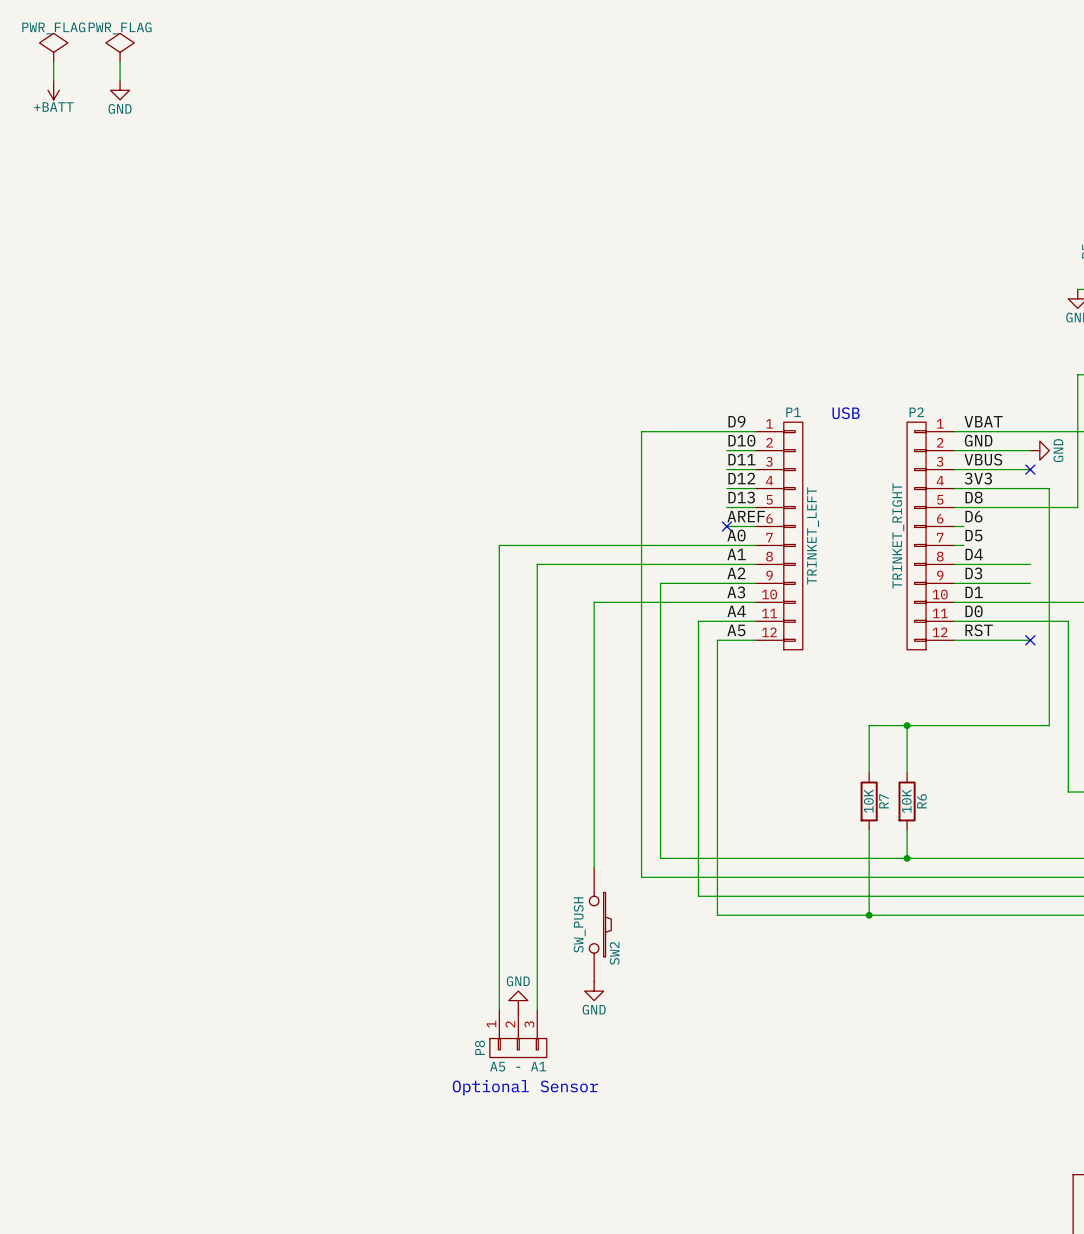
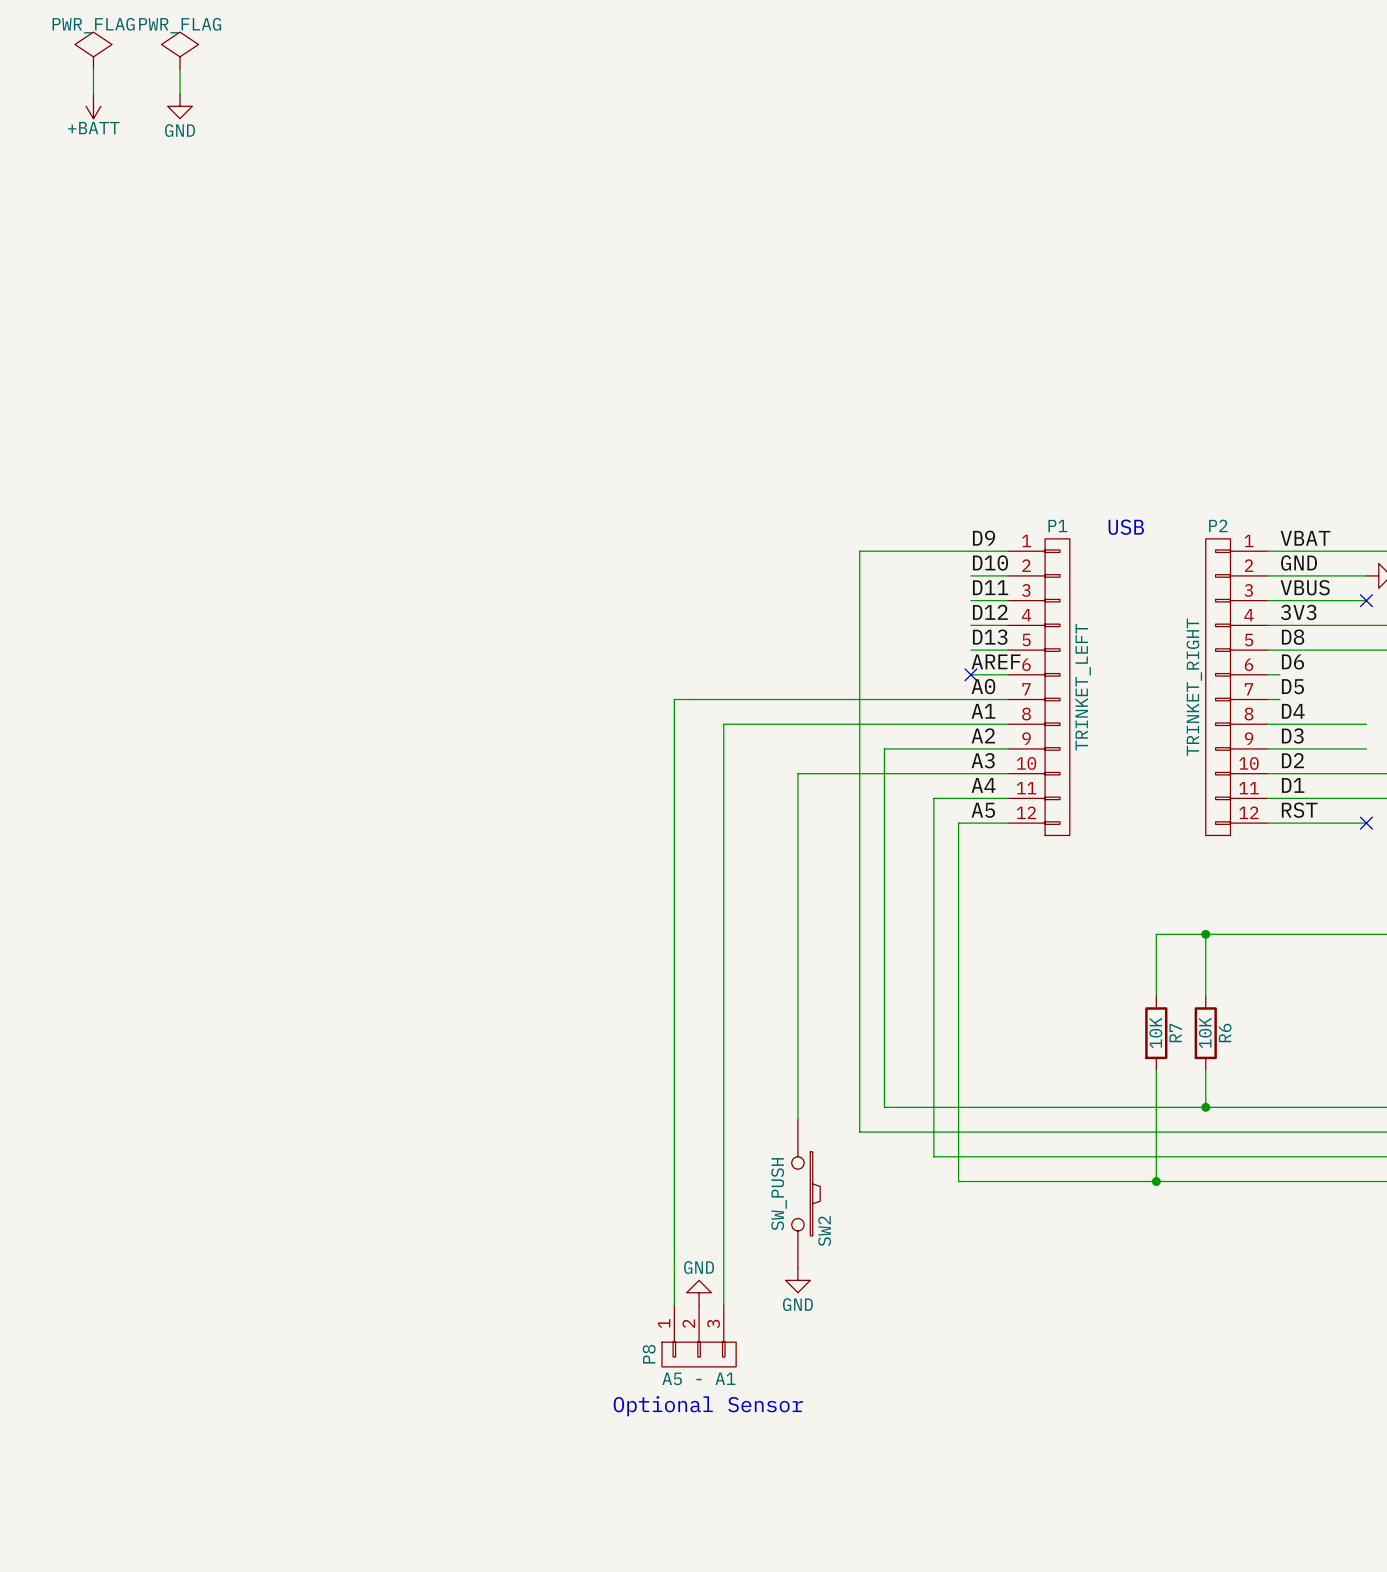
label: D1 (974, 592) -> D2 (1292, 760)
label: D0 (974, 611) -> D1 (1293, 785)

